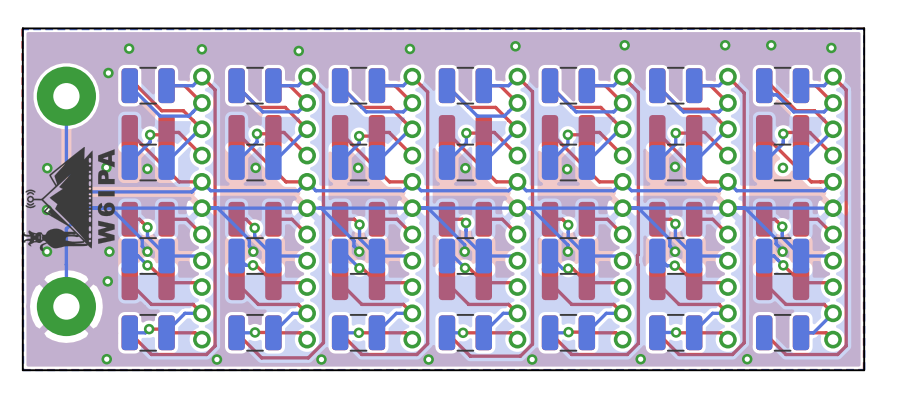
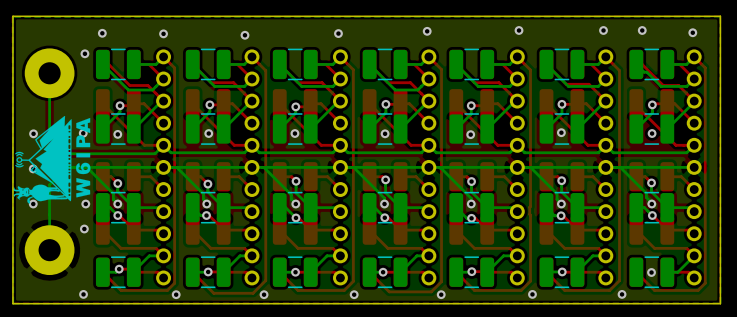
via: none -> (651, 272)

